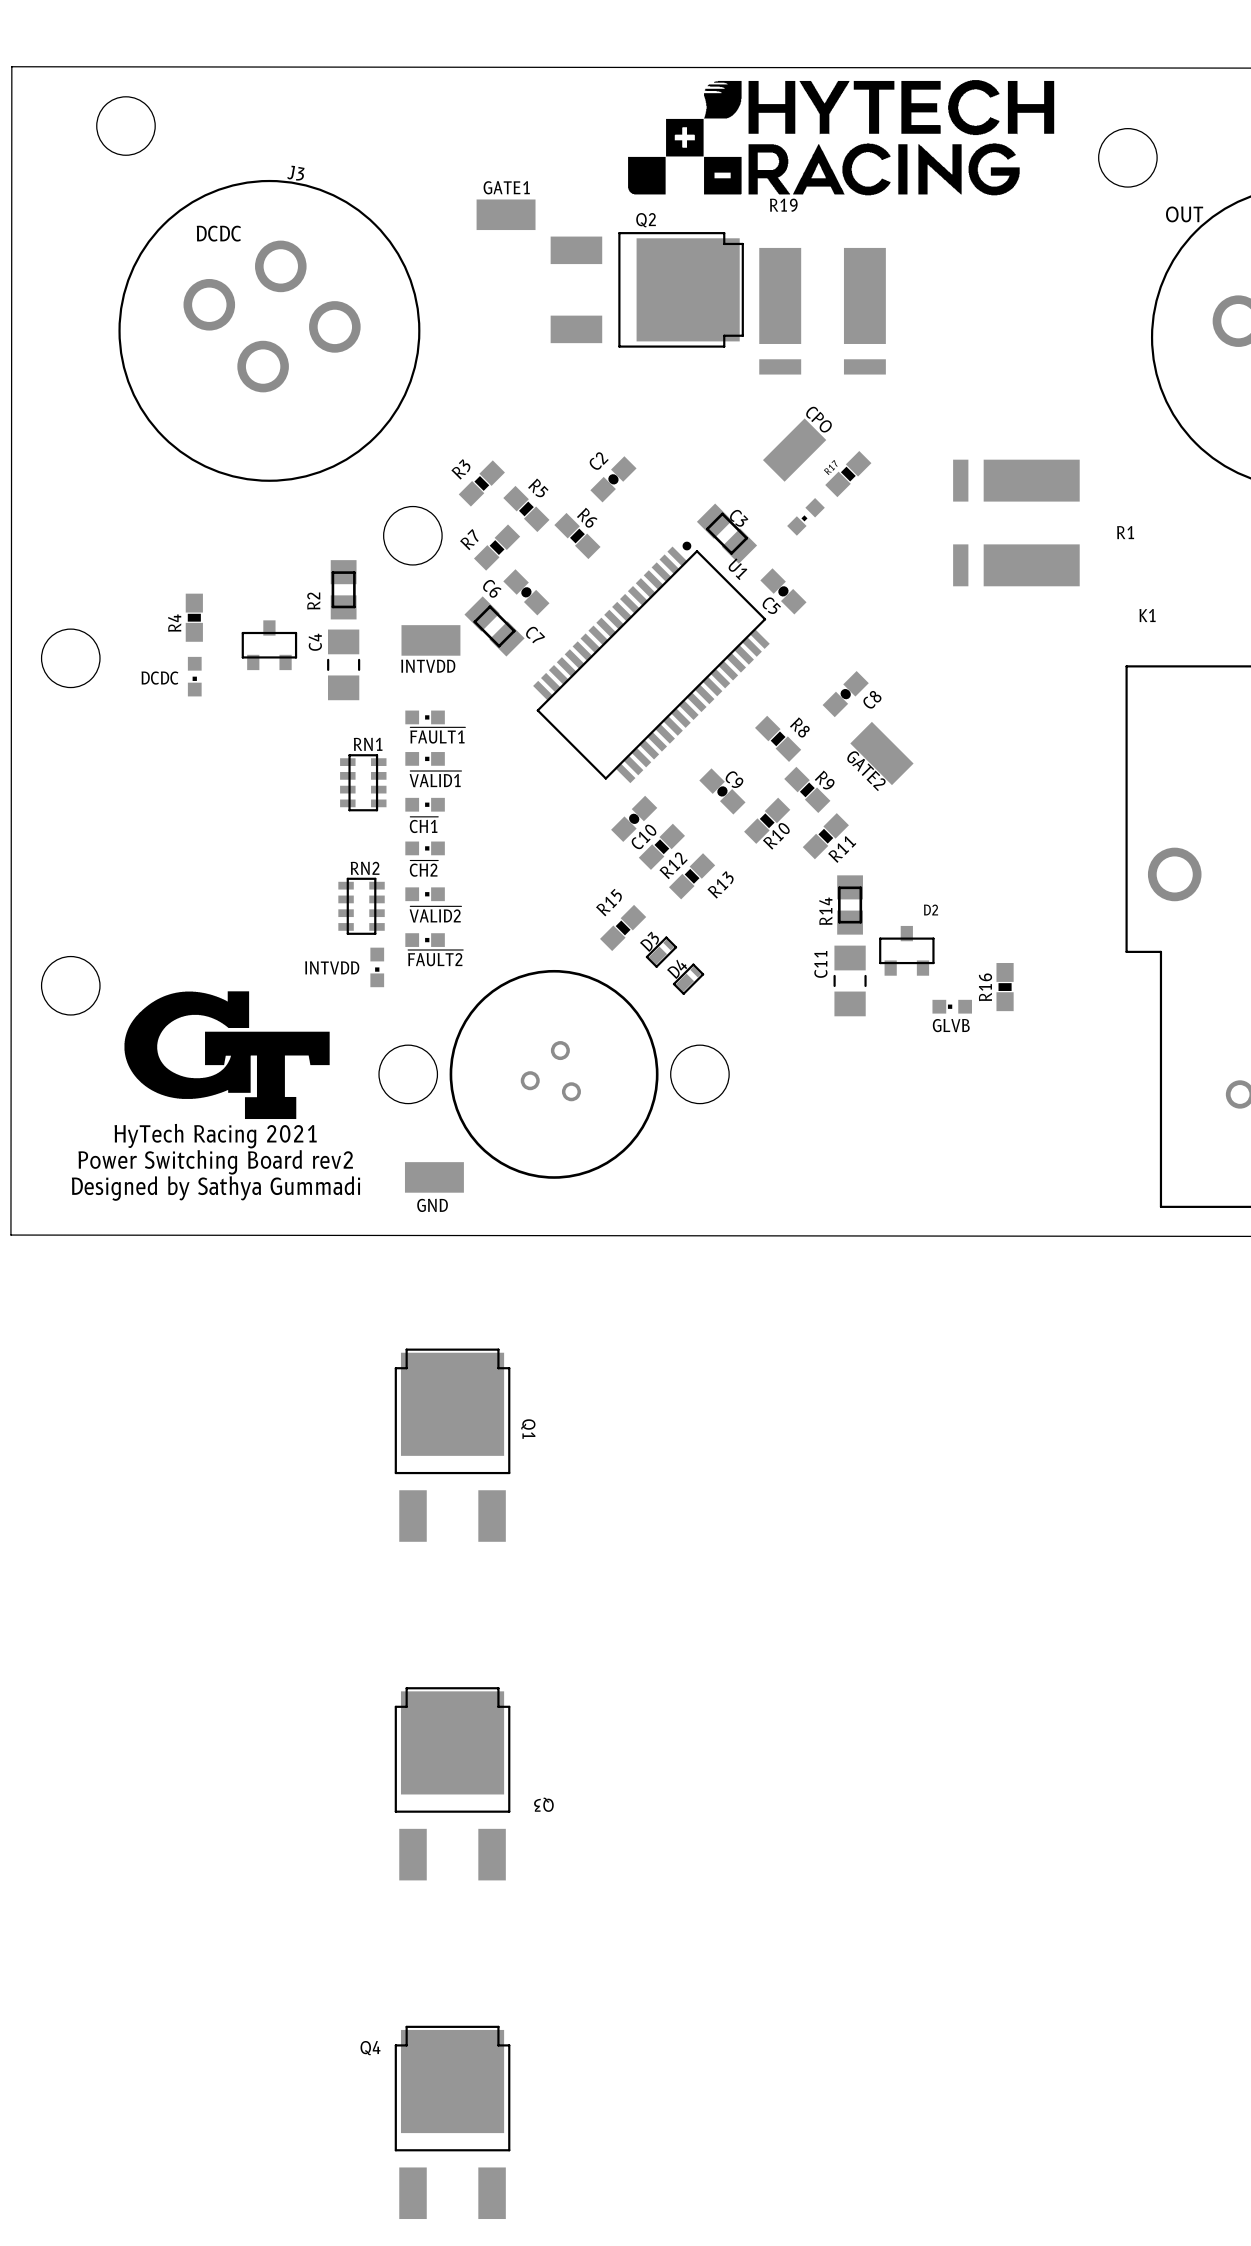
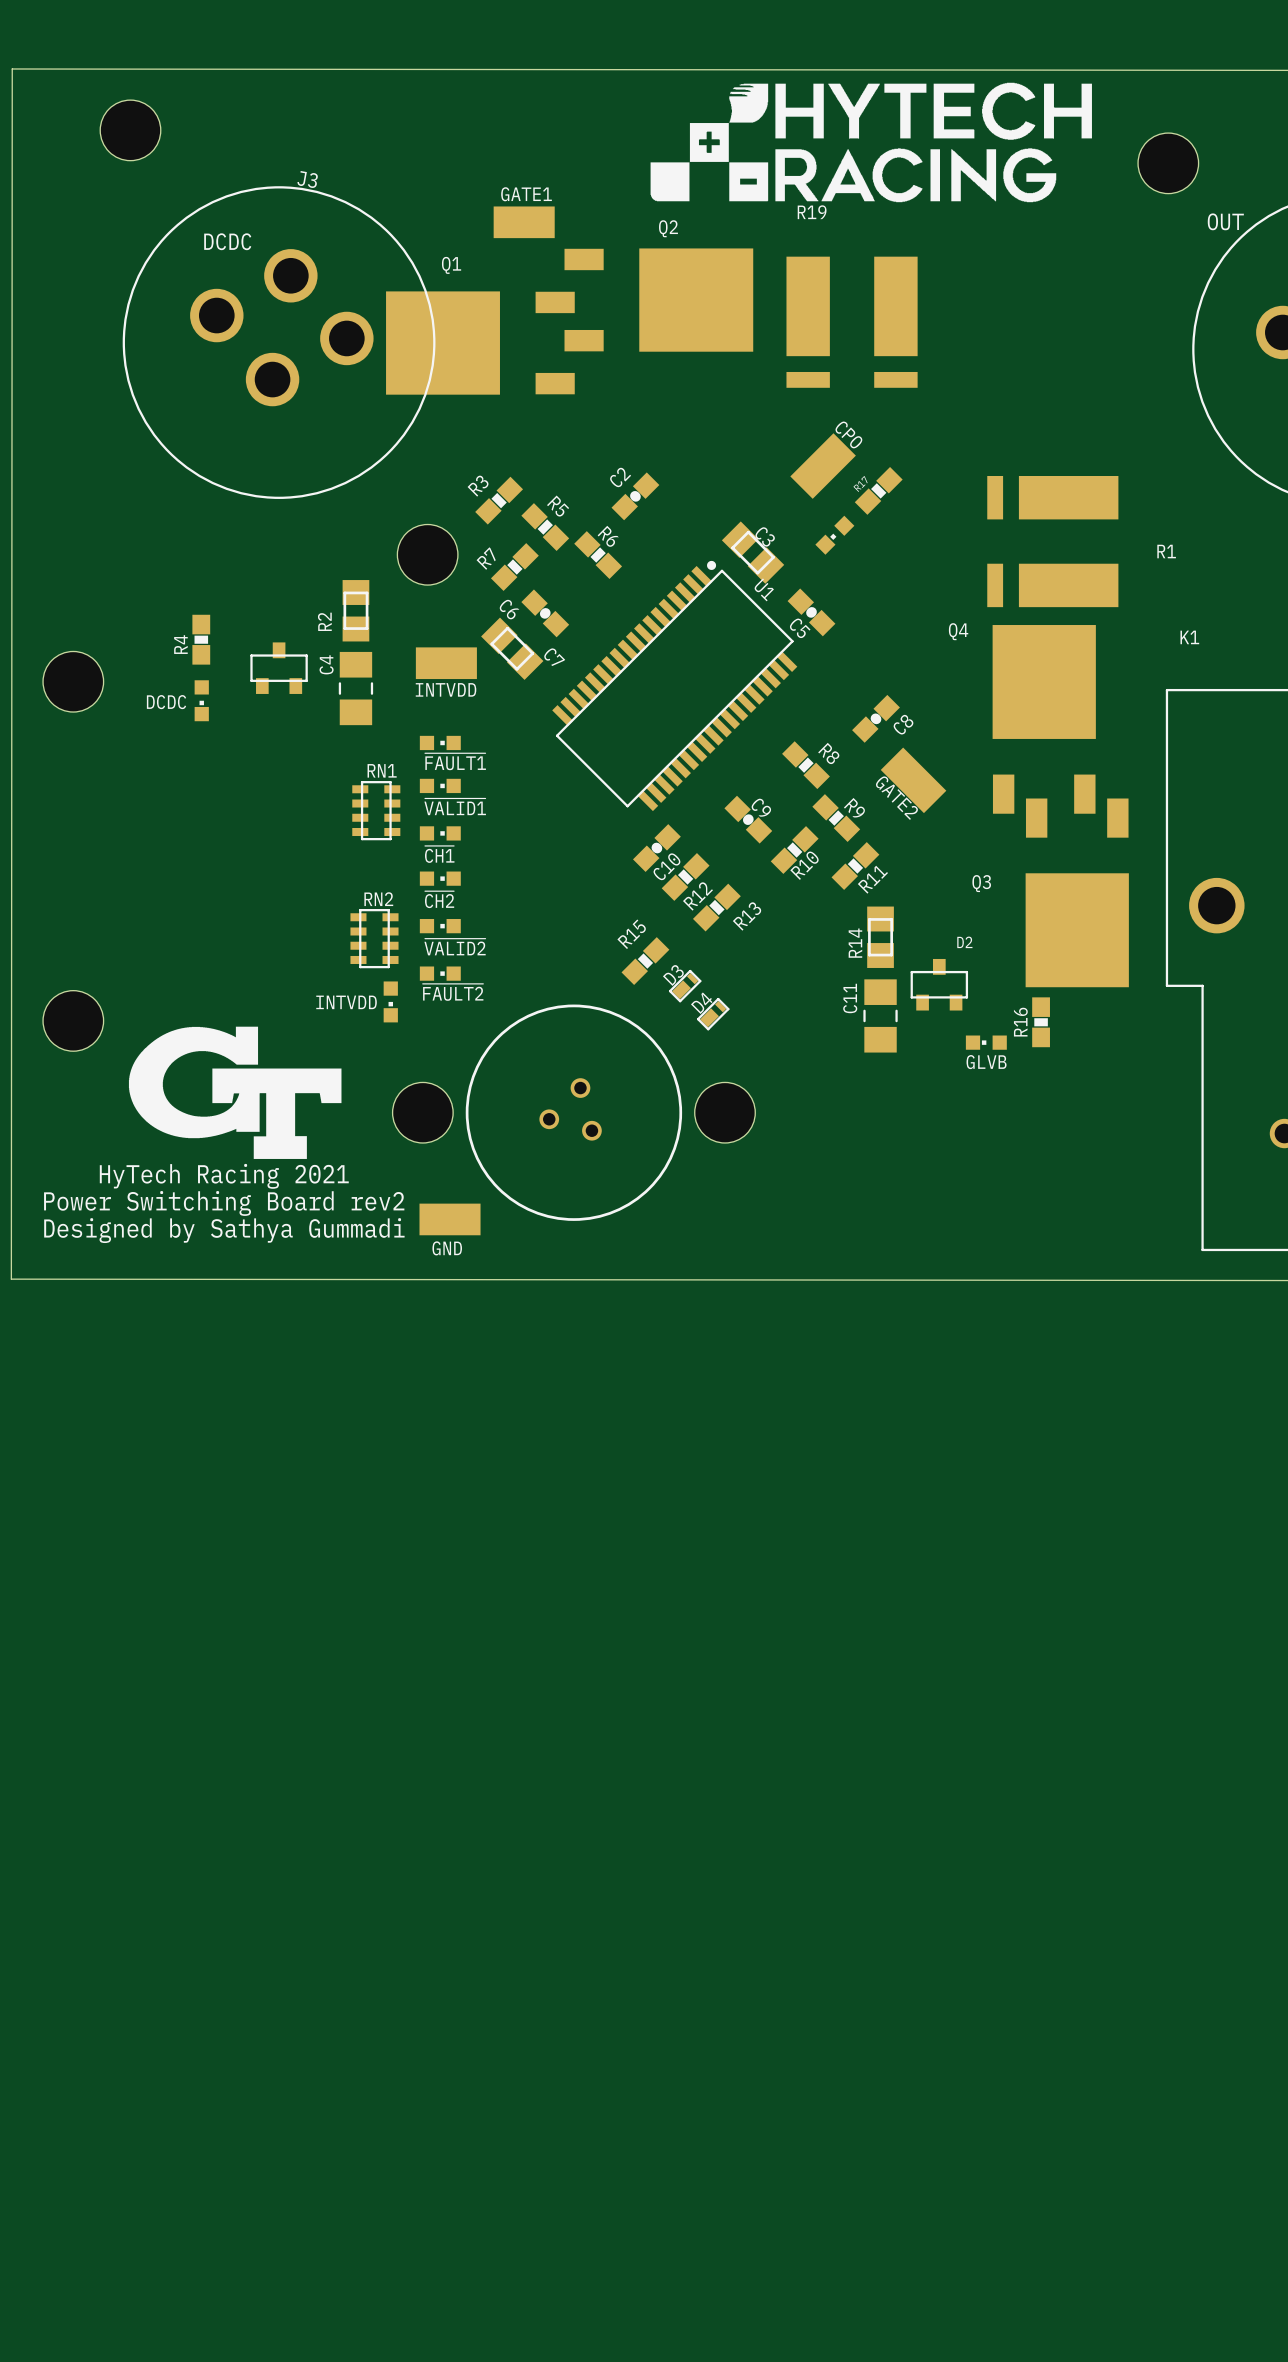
Q2 footprint: [550, 232, 744, 348] -> [564, 248, 754, 352]
Q1 footprint: [394, 1348, 511, 1542] -> [386, 291, 575, 395]
Q1 name position: Q1 (528, 1429) -> Q1 (451, 265)
Q3 footprint: [394, 1687, 511, 1881] -> [1025, 798, 1129, 988]
Q3 name position: Q3 (543, 1804) -> Q3 (981, 883)
Q4 footprint: [394, 2025, 511, 2220] -> [992, 625, 1096, 814]

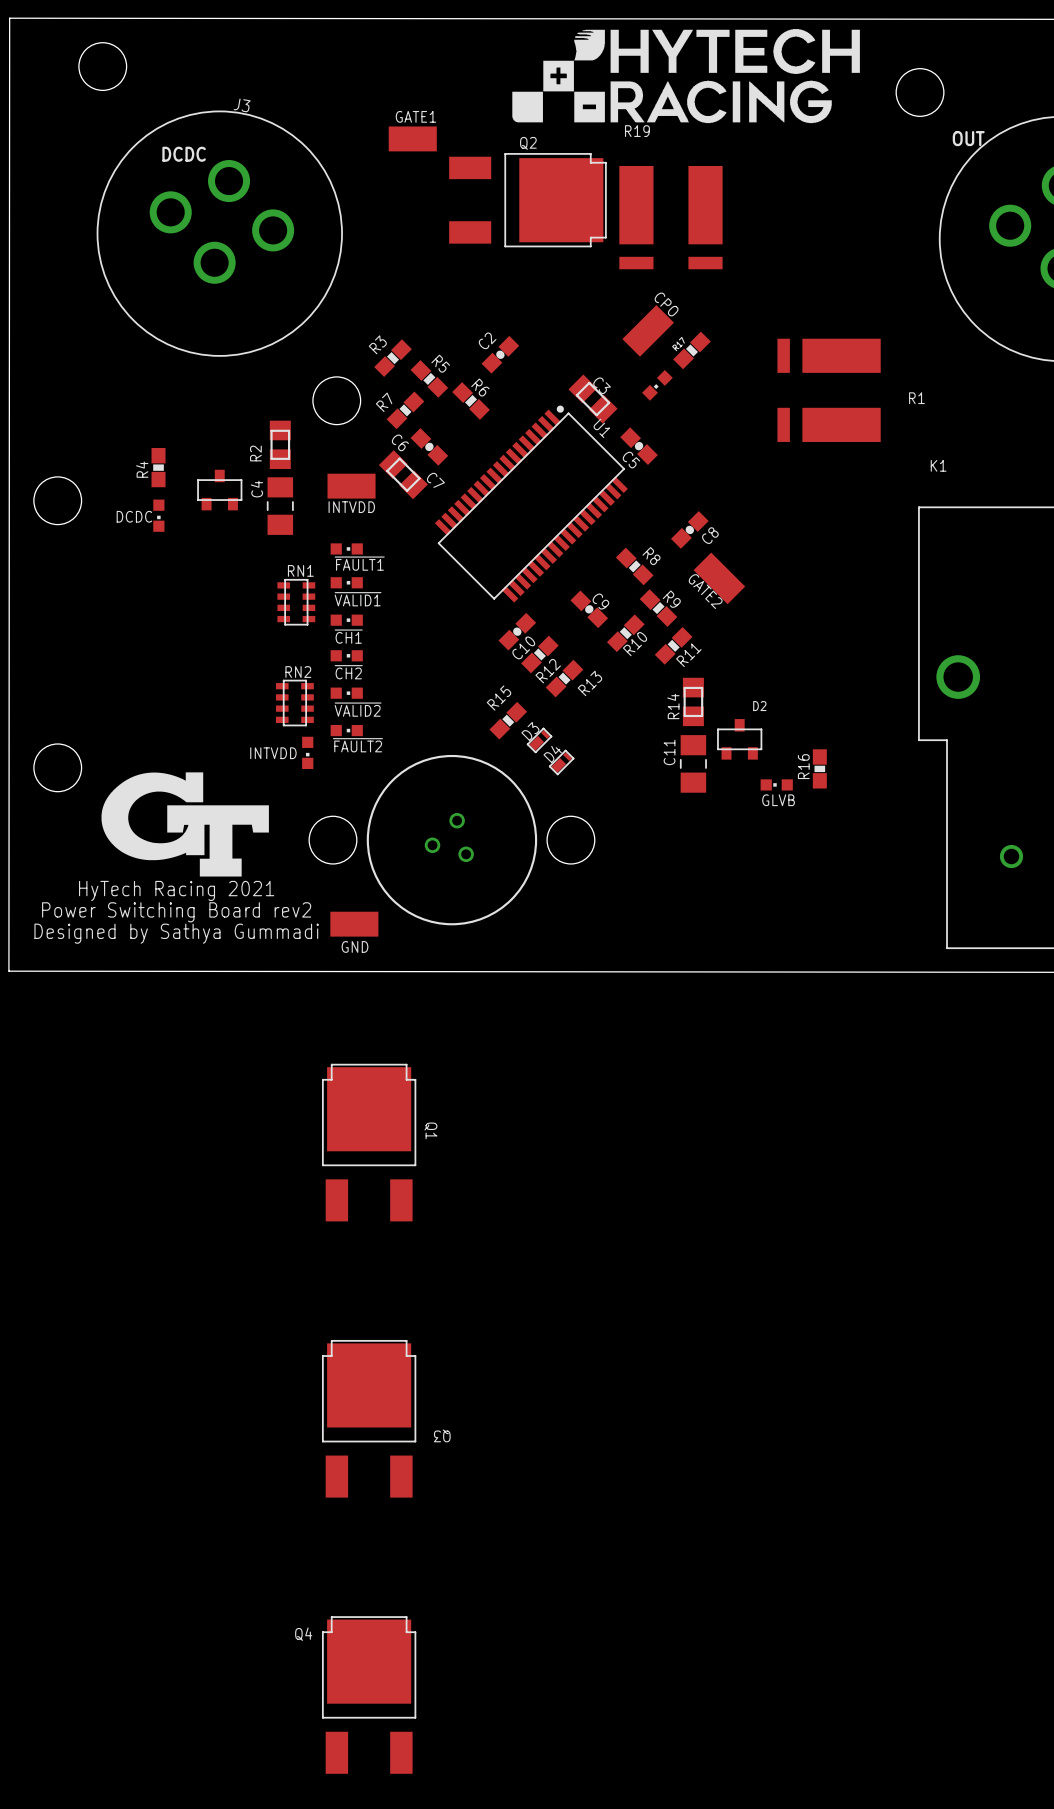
Q2 footprint: [564, 248, 754, 352] -> [449, 153, 607, 248]
Q1 name position: Q1 (451, 265) -> Q1 (430, 1130)
Q1 footprint: [386, 291, 575, 395] -> [321, 1063, 417, 1222]
Q4 footprint: [992, 625, 1096, 814] -> [321, 1616, 417, 1774]
Q3 footprint: [1025, 798, 1129, 988] -> [321, 1339, 417, 1498]
Q3 name position: Q3 (981, 883) -> Q3 (442, 1435)

